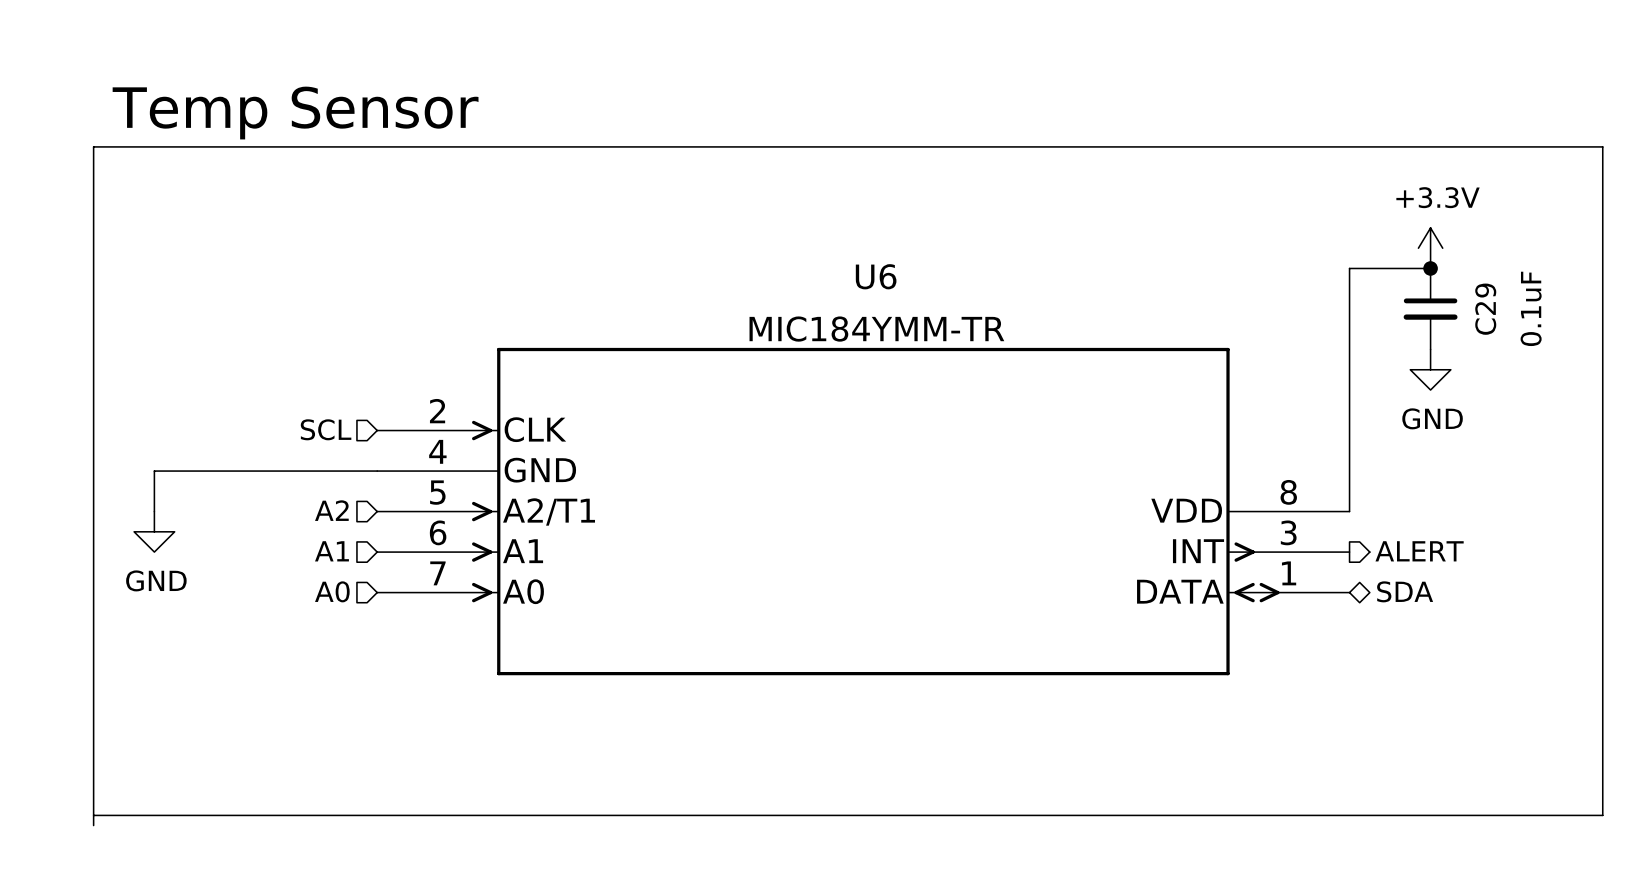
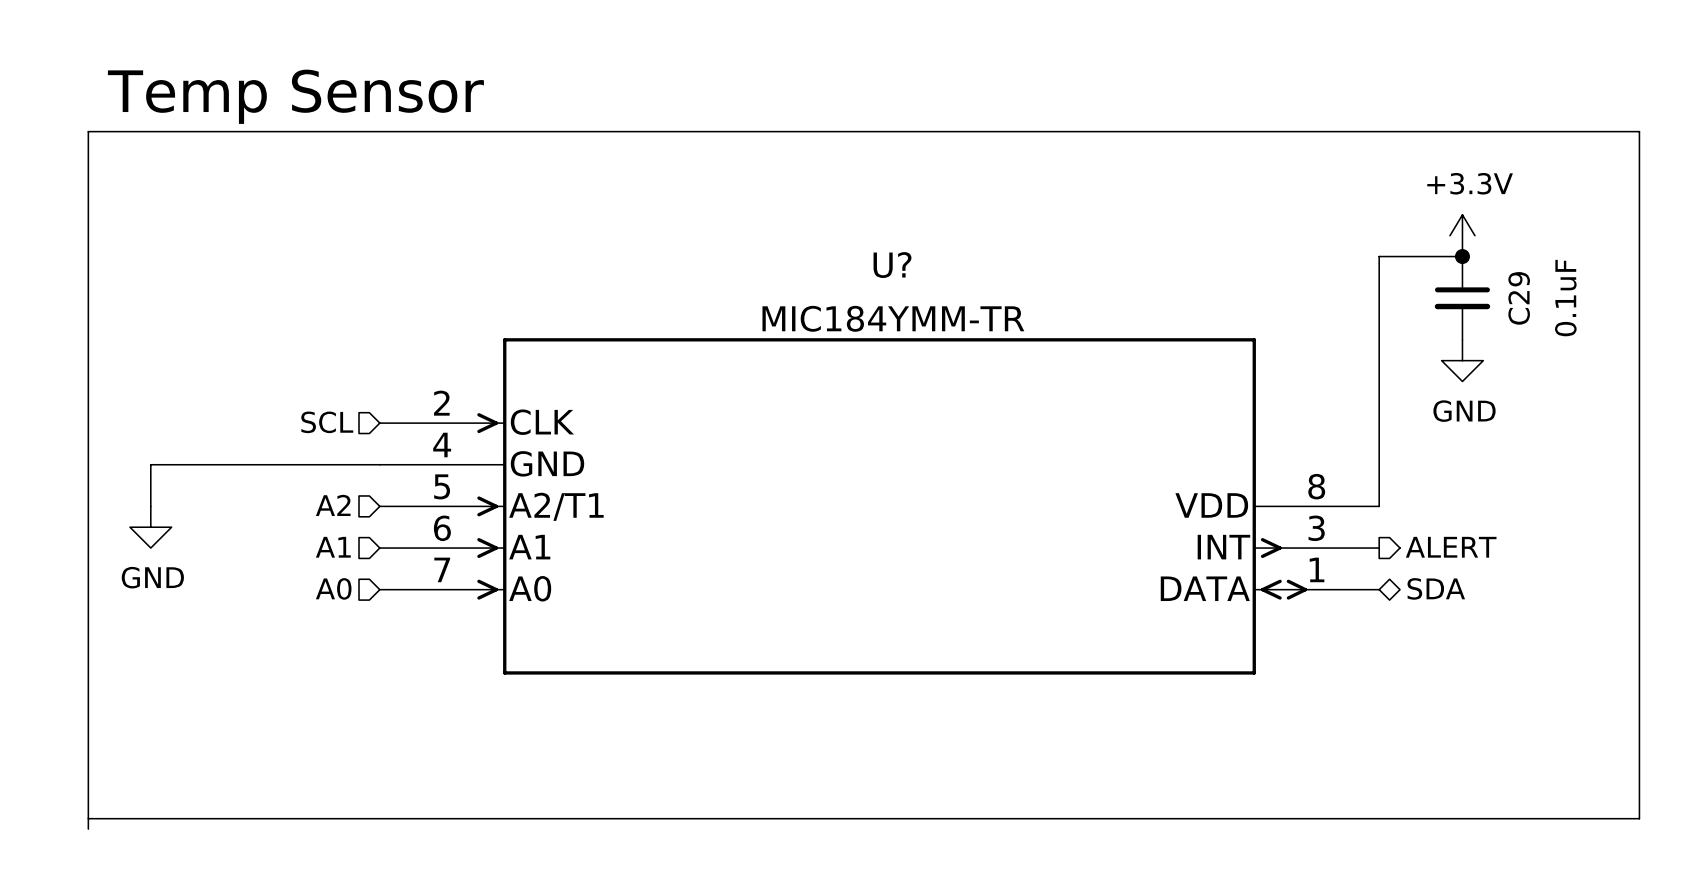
U6 name: U6 (876, 276) -> U? (892, 265)

